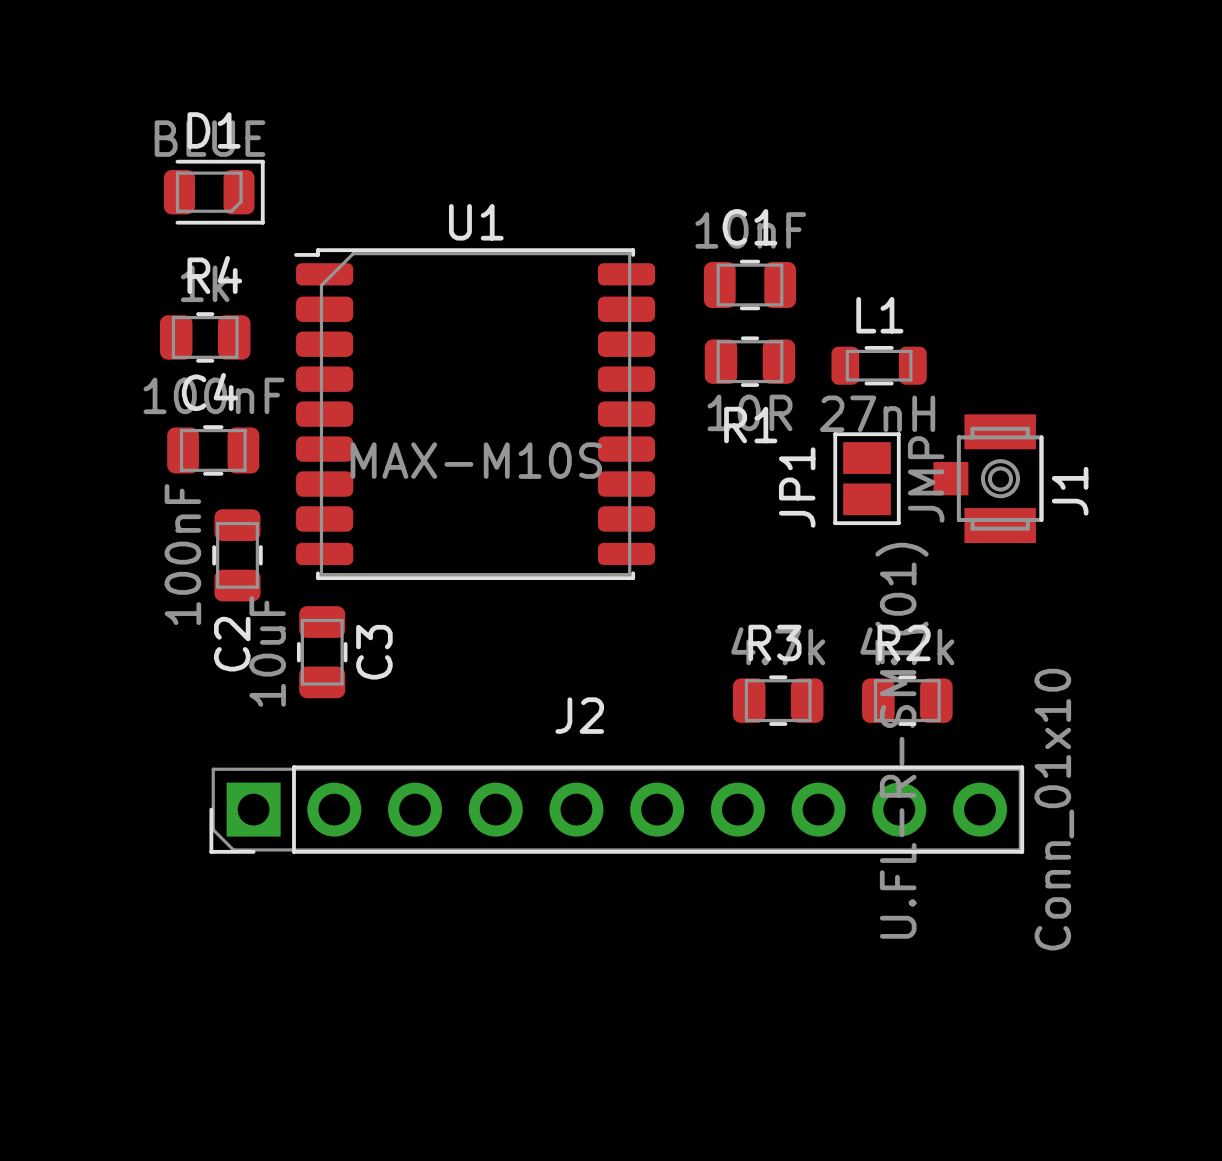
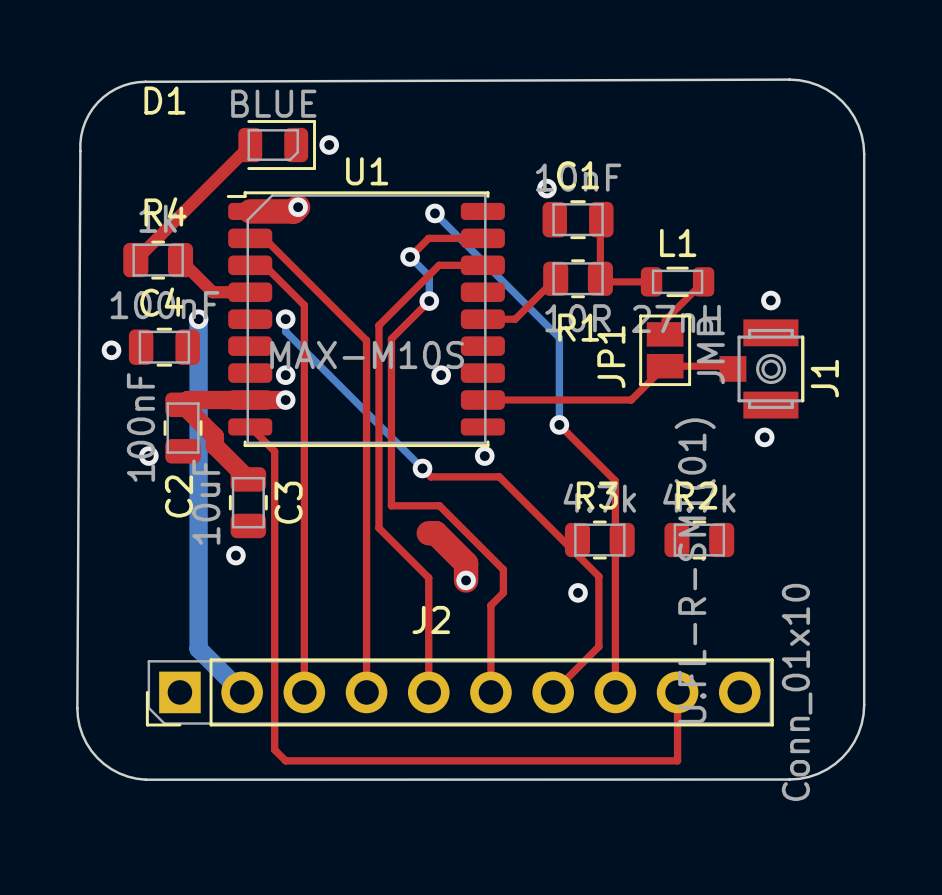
board edge: none -> (789, 79) (145, 81) (130, 83) (116, 88) (97, 102) (85, 121) (80, 143) (77, 708) (82, 734) (97, 757) (119, 773) (145, 779) (789, 779) (818, 773) (842, 757) (858, 733) (864, 704) (863, 144) (858, 125) (842, 101) (818, 85) (789, 79)
top track: none -> (250, 145) (135, 260)
via: none -> (329, 145)
D1 position: (214, 192) -> (277, 145)
via: none -> (546, 188)
top track: none -> (298, 207) (293, 211) (250, 211)
via: none -> (298, 207)
bottom track: none -> (434, 213) (559, 337) (559, 424)
via: none -> (434, 213)
top track: none -> (601, 219) (600, 278) (603, 281) (651, 281)
top track: none -> (250, 238) (264, 238) (366, 340) (366, 692)
top track: none -> (482, 238) (428, 238) (410, 256)
bottom track: none -> (410, 256) (429, 276) (429, 301)
via: none -> (410, 256)
top track: none -> (180, 260) (212, 292) (250, 292)
top track: none -> (250, 265) (264, 265) (304, 305) (304, 692)
top track: none -> (482, 265) (439, 265) (378, 325) (378, 528) (428, 577) (428, 692)
top track: none -> (555, 278) (515, 319) (482, 319)
top track: none -> (703, 281) (665, 320) (665, 334)
via: none -> (770, 300)
top track: none -> (429, 301) (391, 338) (391, 505) (439, 505) (503, 569) (503, 592) (490, 605) (490, 692)
via: none -> (429, 301)
bottom track: none -> (198, 319) (198, 648) (242, 692)
via: none -> (198, 319)
bottom track: none -> (285, 319) (285, 331) (422, 468)
via: none -> (285, 319)
via: none -> (111, 350)
JP1 position: (867, 478) -> (665, 350)
top track: none -> (732, 368) (730, 366) (665, 366) (631, 400) (482, 400)
via: none -> (285, 375)
via: none -> (441, 375)
top track: none -> (285, 400) (187, 400) (183, 404) (214, 436) (214, 445) (248, 479)
via: none -> (285, 400)
top track: none -> (559, 424) (615, 480) (615, 692)
via: none -> (559, 424)
top track: none -> (250, 426) (274, 451) (274, 749) (285, 760) (677, 760) (677, 692)
via: none -> (764, 437)
via: none -> (148, 456)
via: none -> (484, 456)
top track: none -> (422, 468) (430, 476) (499, 476) (598, 576) (598, 646) (553, 692)
via: none -> (422, 468)
top track: none -> (428, 533) (435, 533) (466, 563) (466, 580)
via: none -> (235, 555)
via: none -> (466, 580)
via: none -> (578, 592)
J2 position: (616, 809) -> (459, 692)

